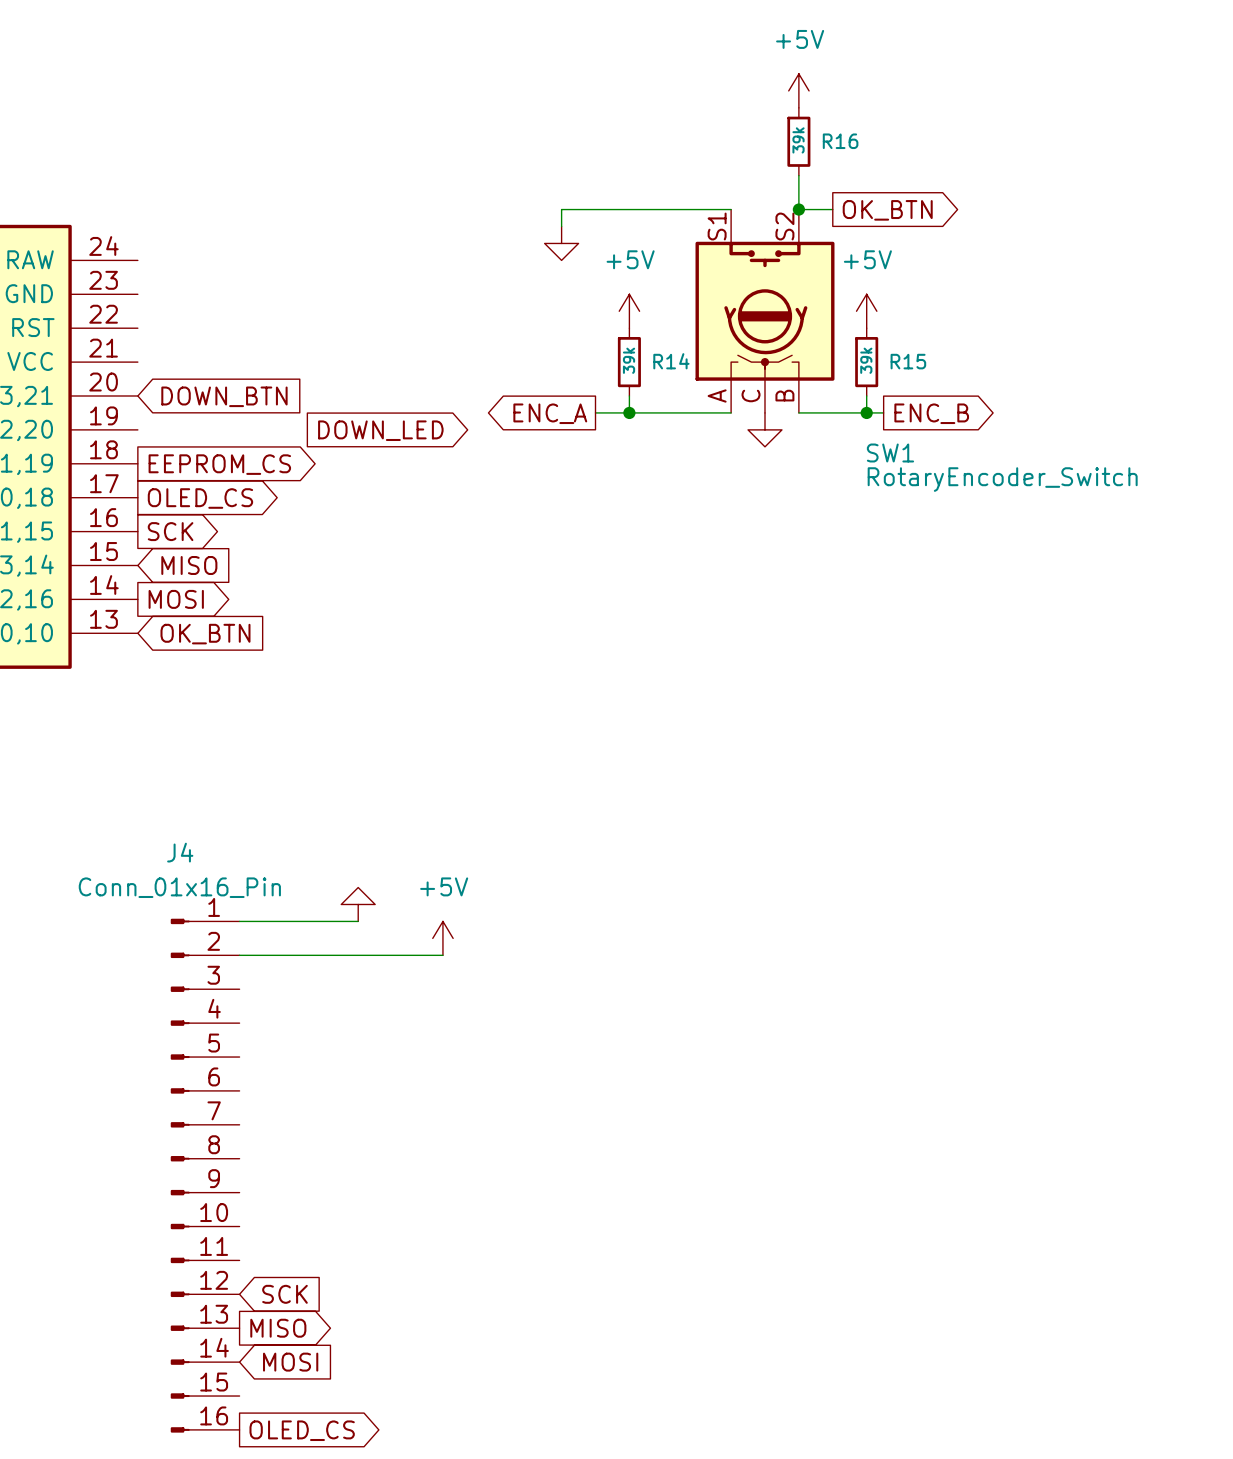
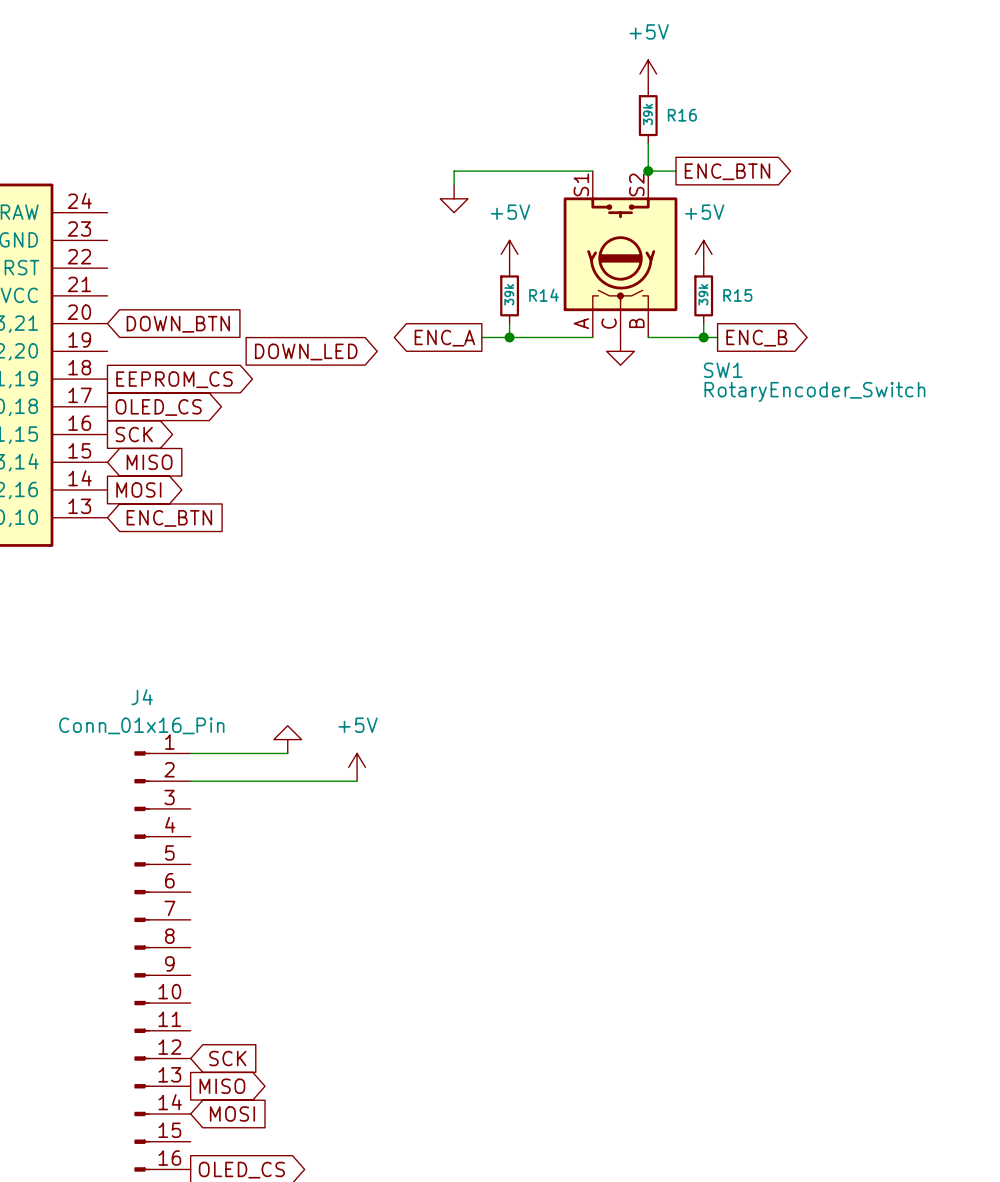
global label: OK_BTN (887, 210) -> ENC_BTN (727, 171)
global label: OK_BTN (205, 634) -> ENC_BTN (169, 518)

